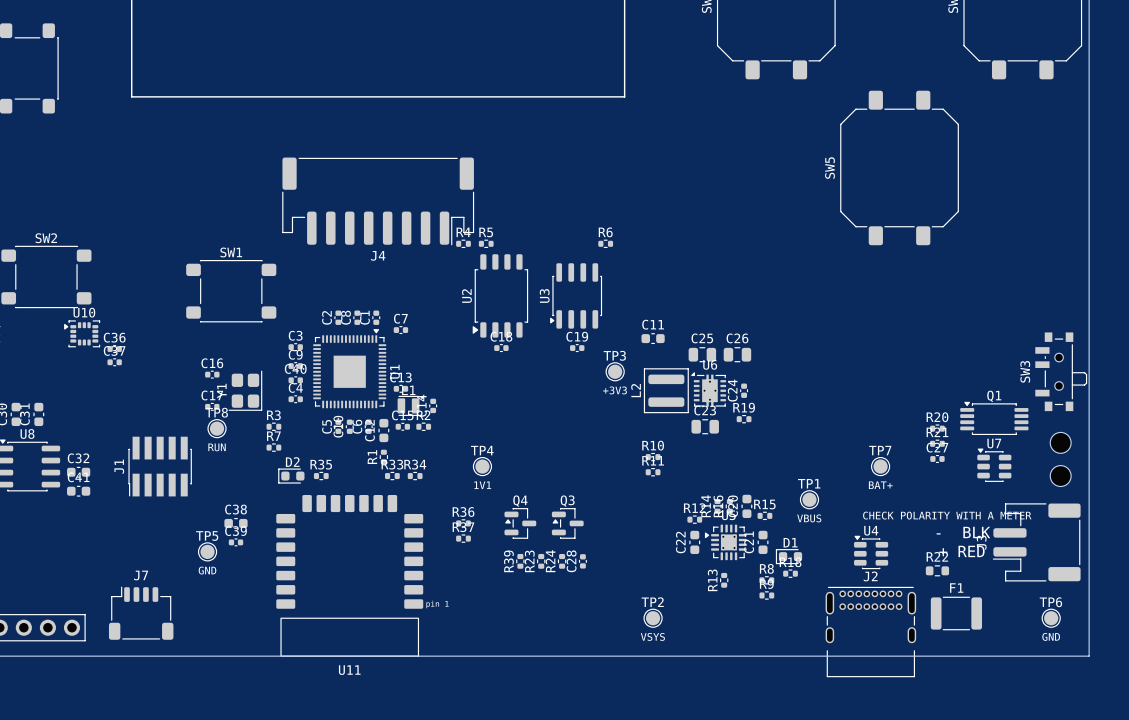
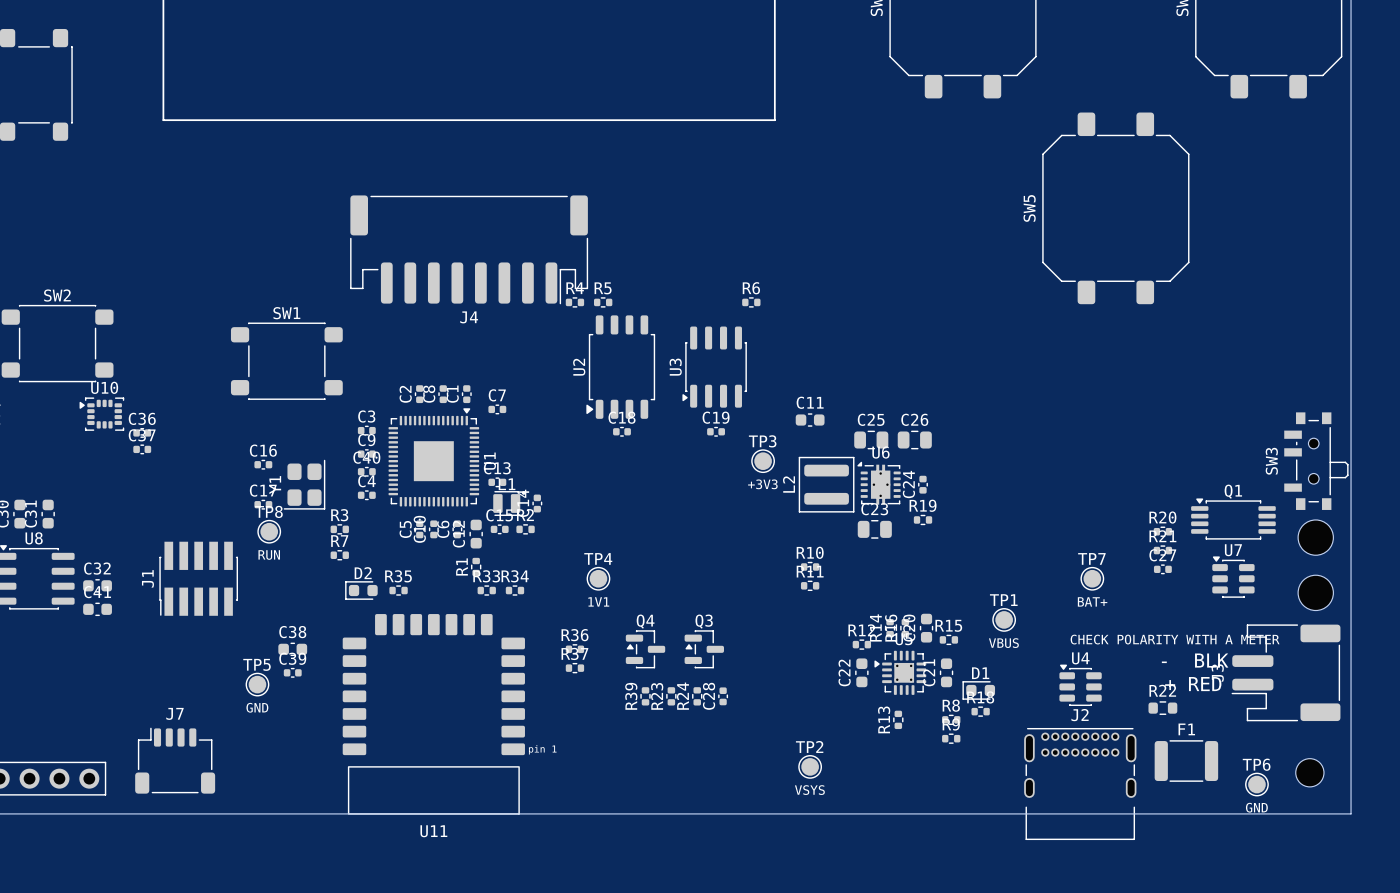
part footprint: [1050, 432, 1072, 454] -> [1298, 519, 1334, 556]
part footprint: [1050, 465, 1072, 487] -> [1298, 575, 1334, 611]
TP6 position: (1051, 618) -> (1256, 784)
part: none -> (1309, 772)

